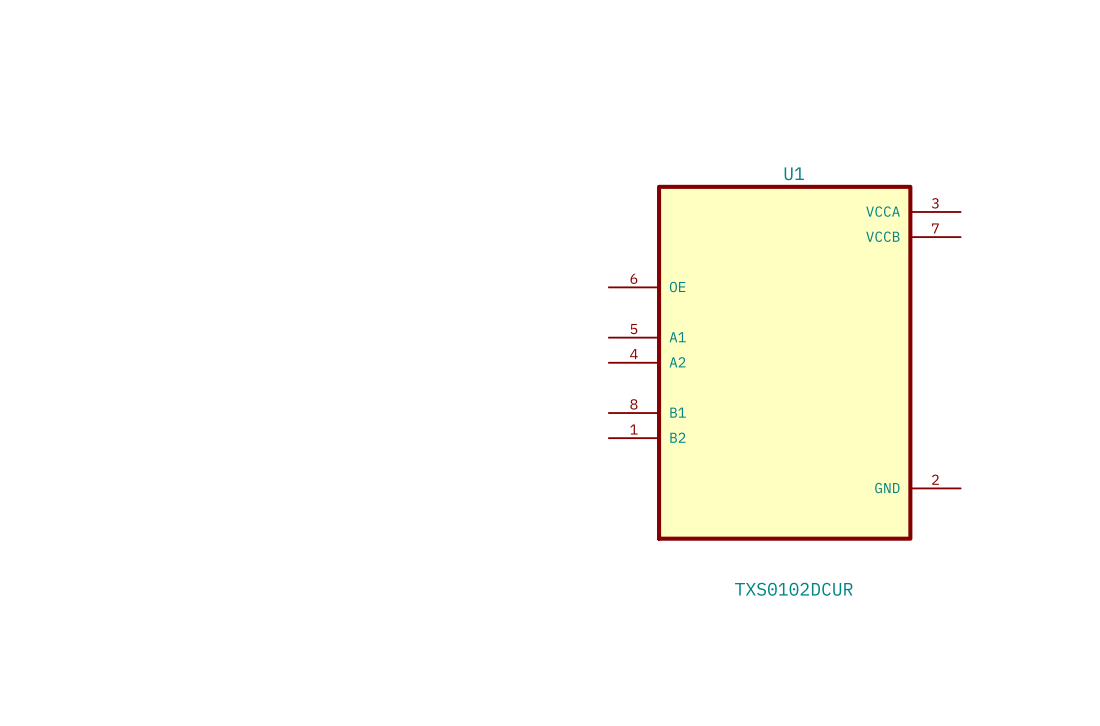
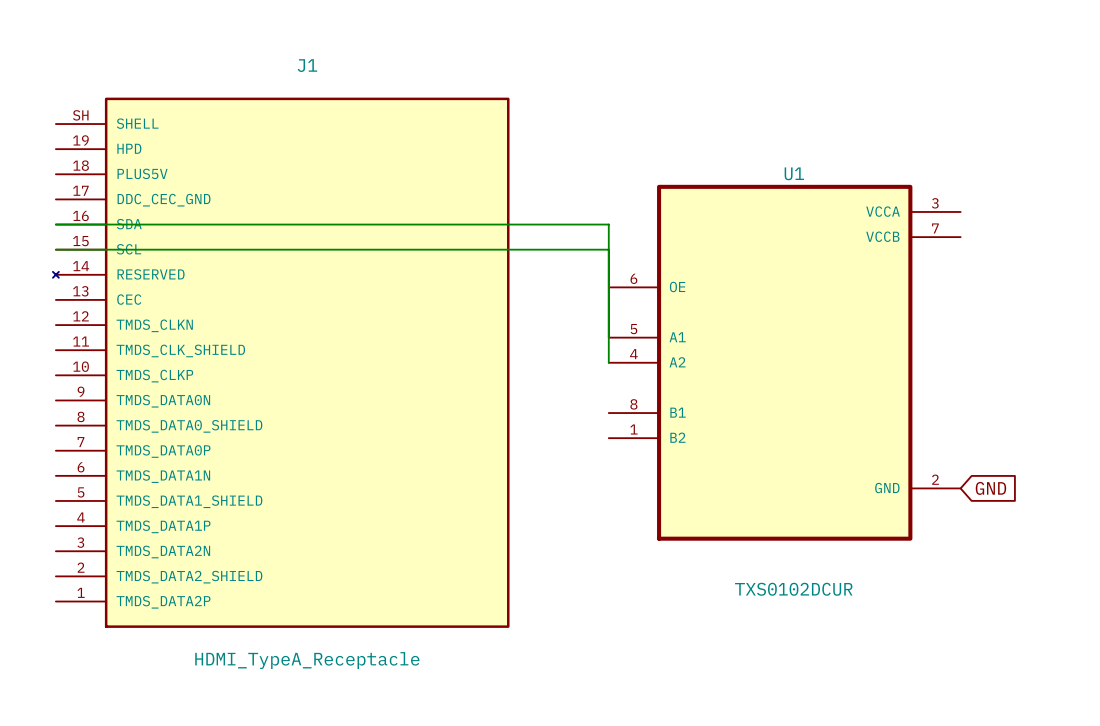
wire: none -> (55, 224) (608, 224) (608, 362)
wire: none -> (55, 249) (608, 249)
J1: none -> HDMI_TypeA_Receptacle (281, 362)
global label: none -> GND (990, 488)

